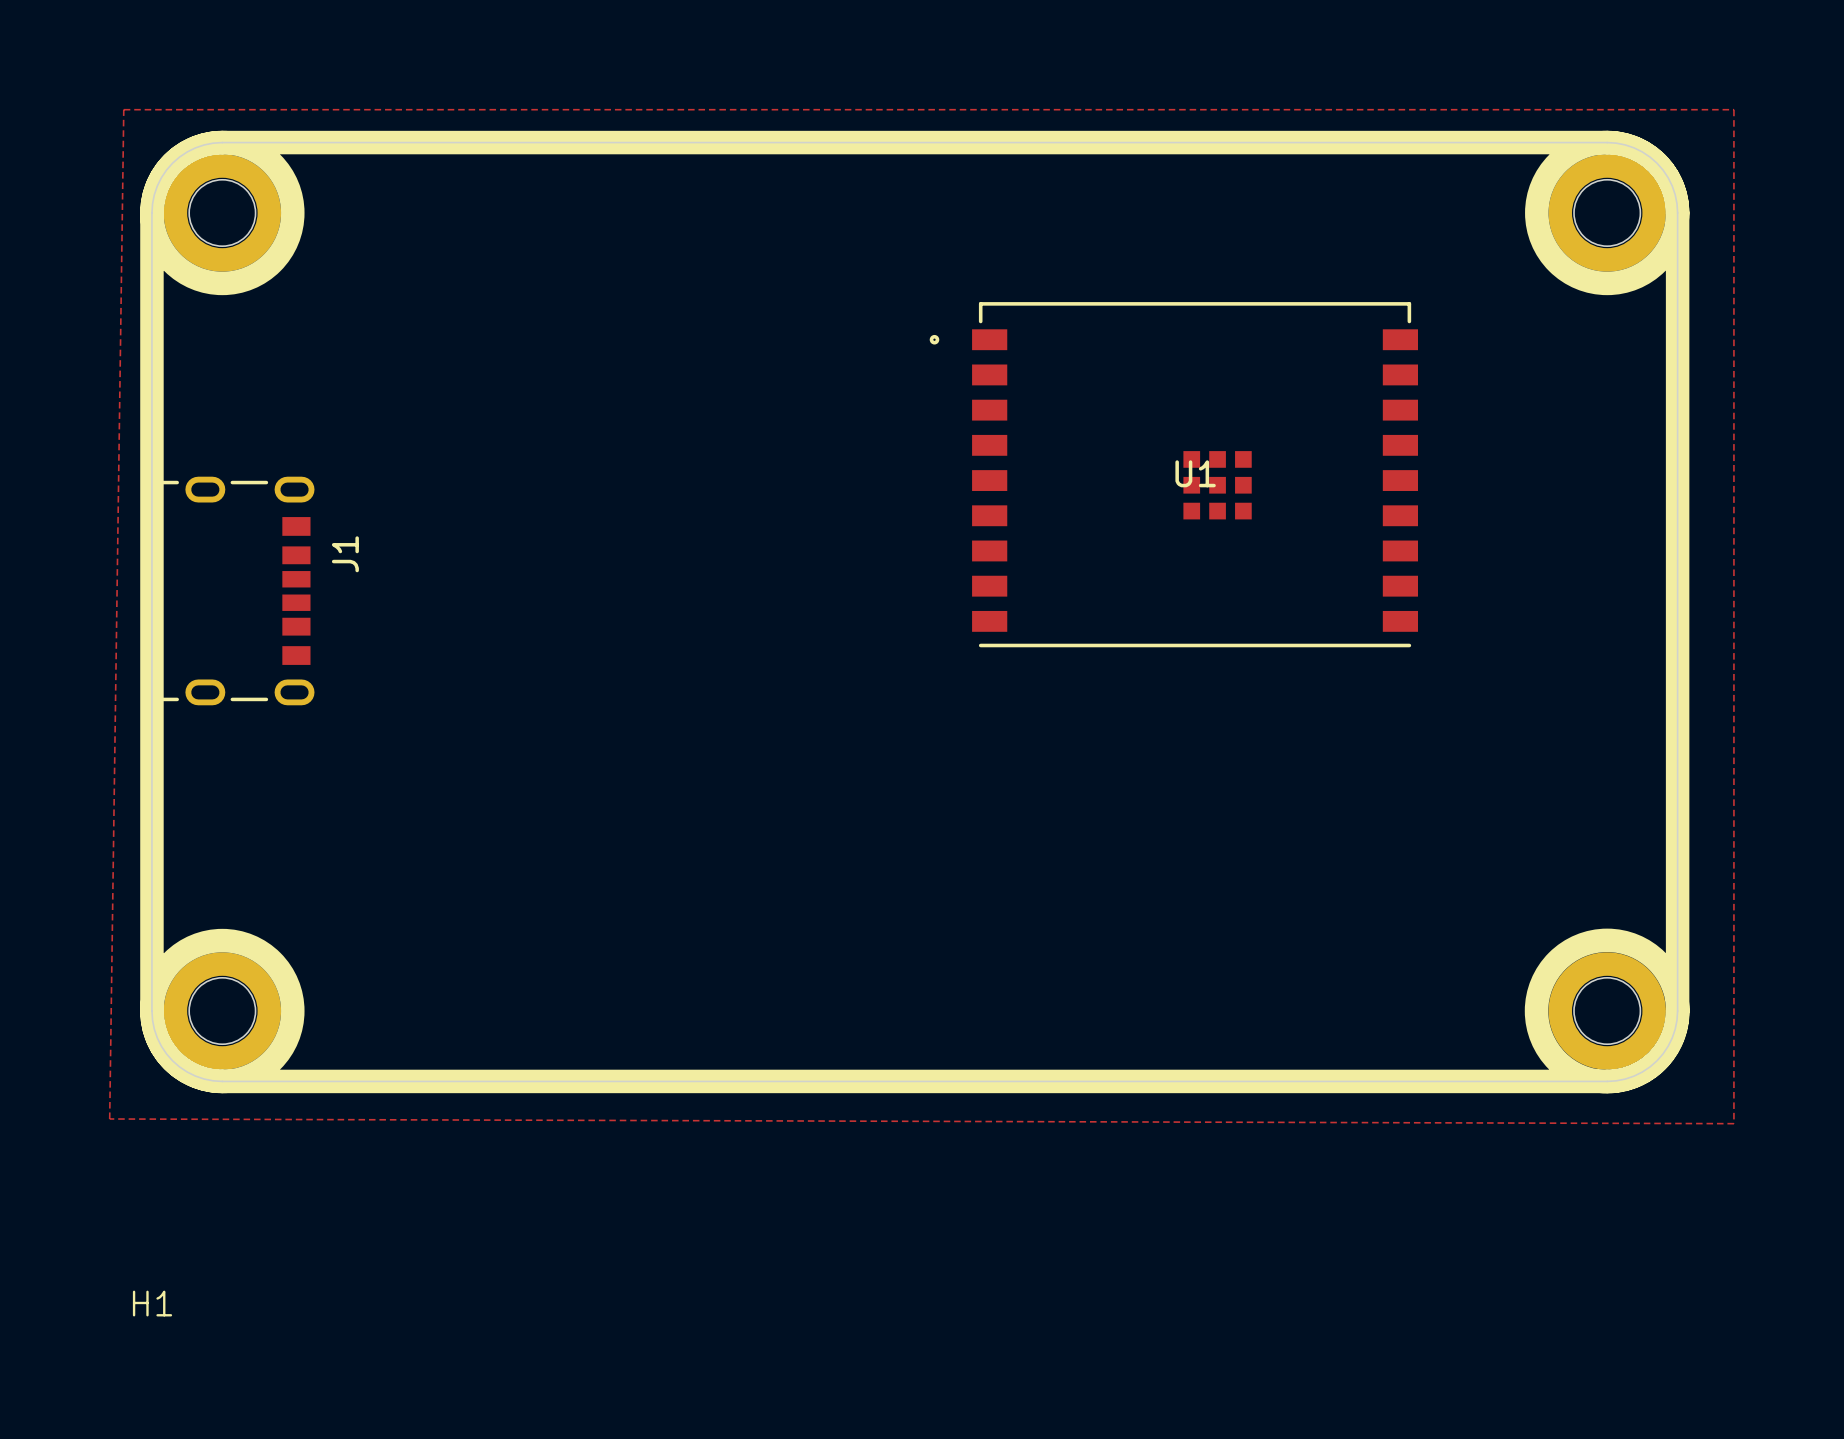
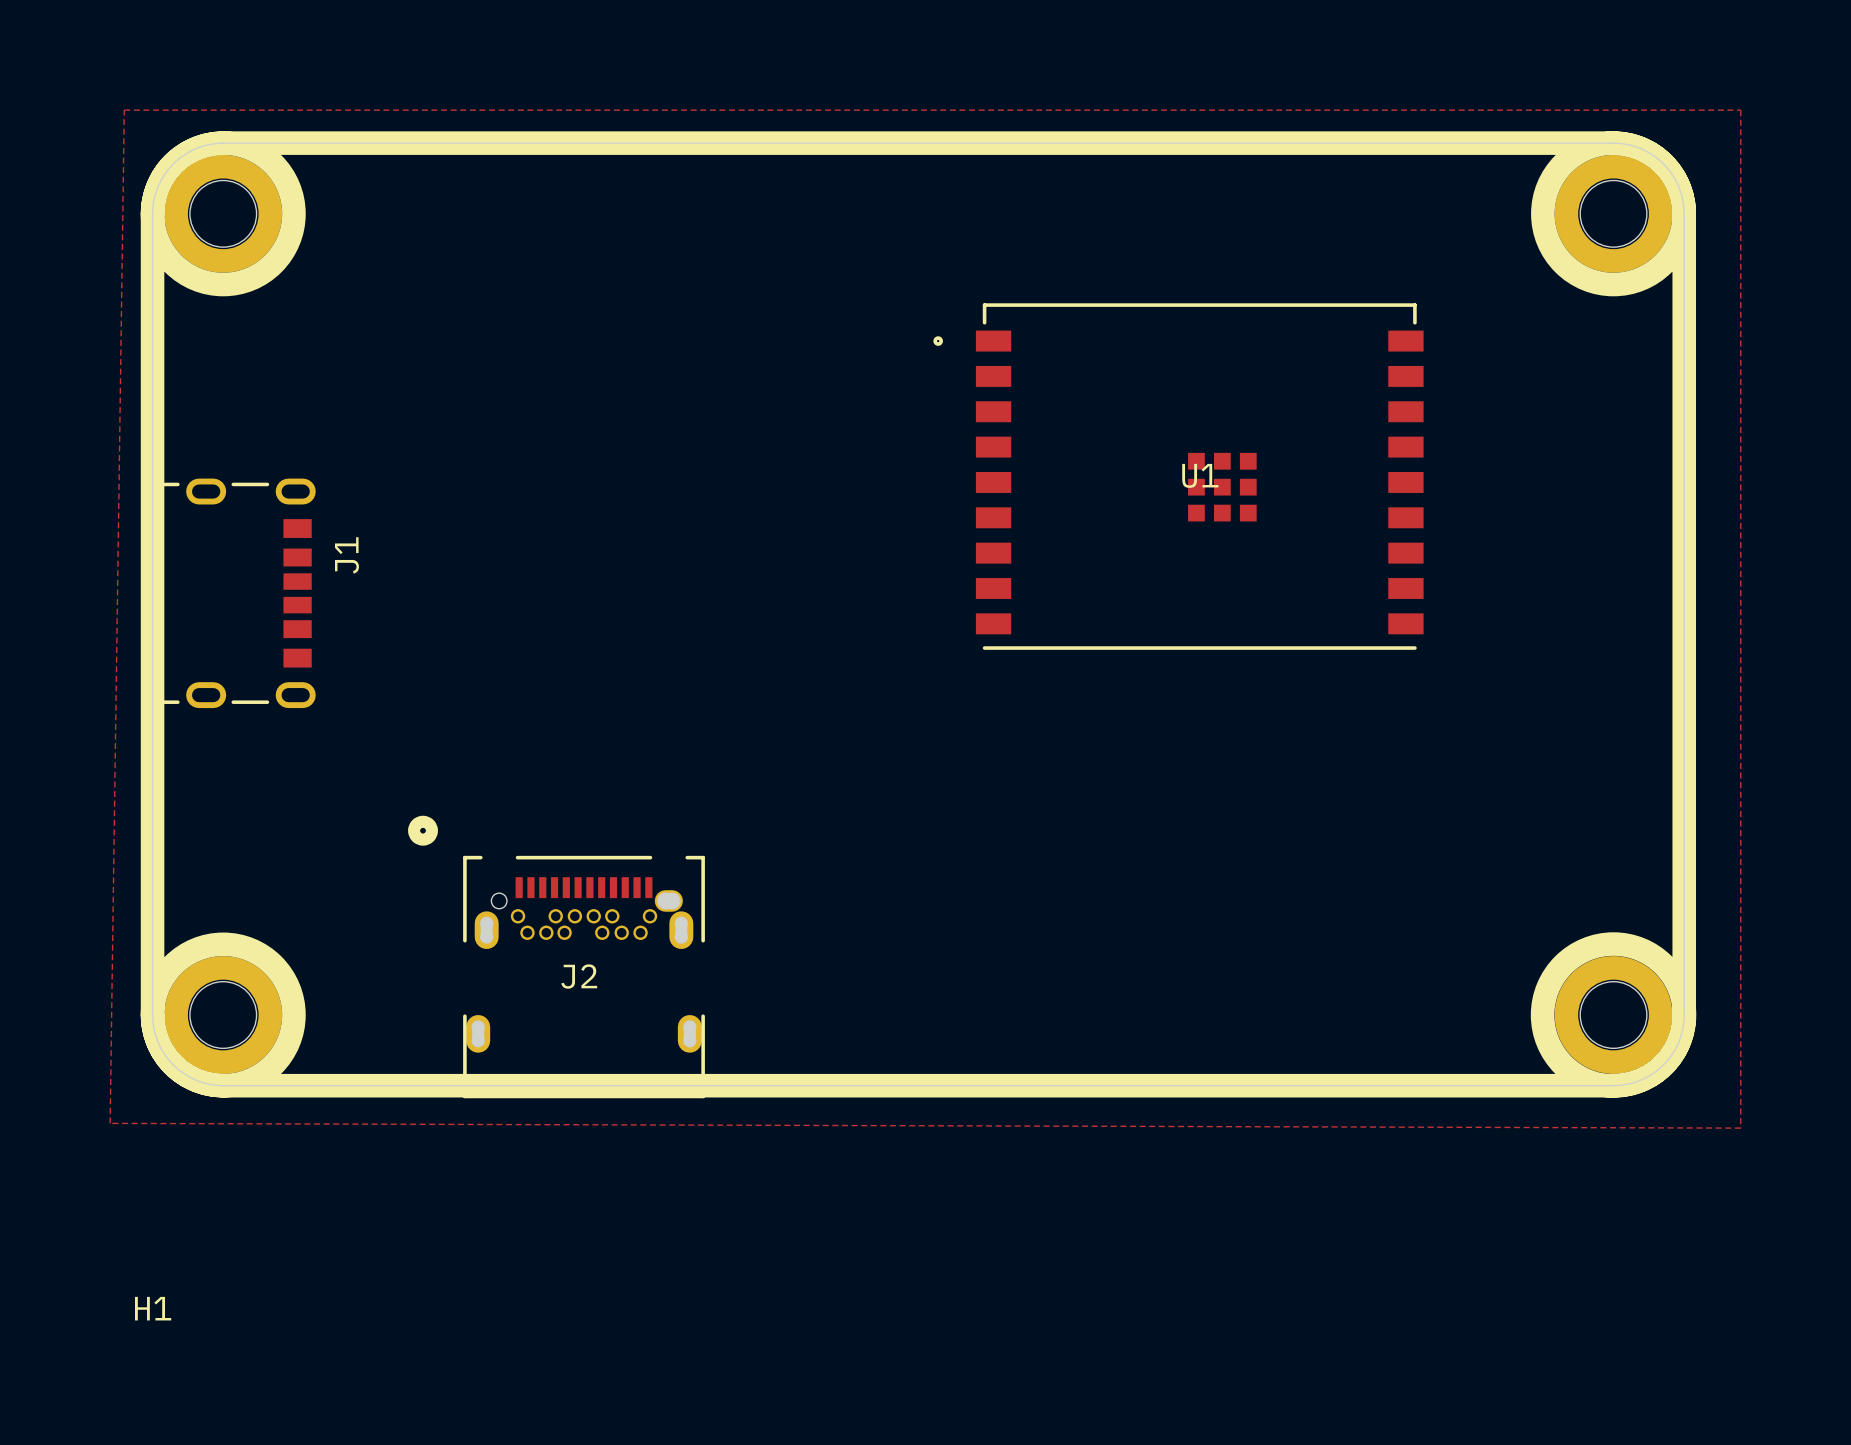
J2: none -> (556, 957)

